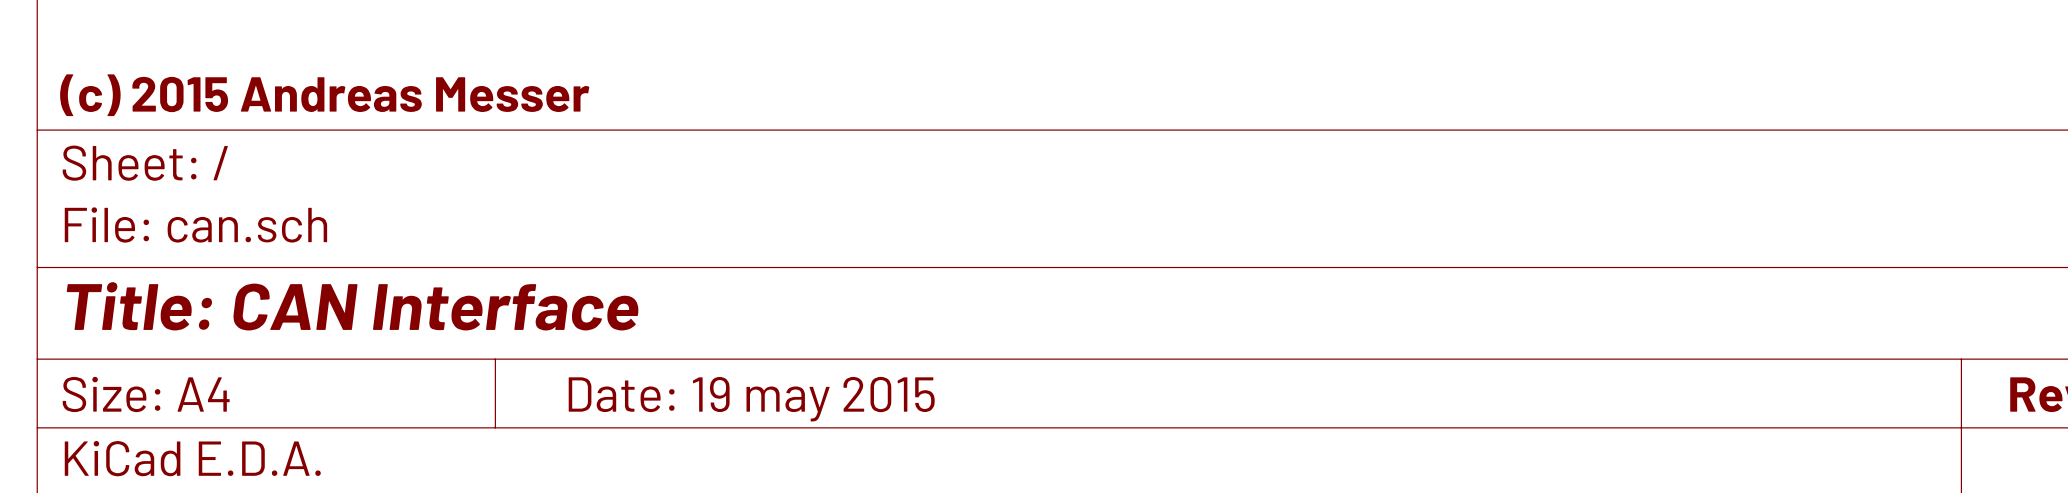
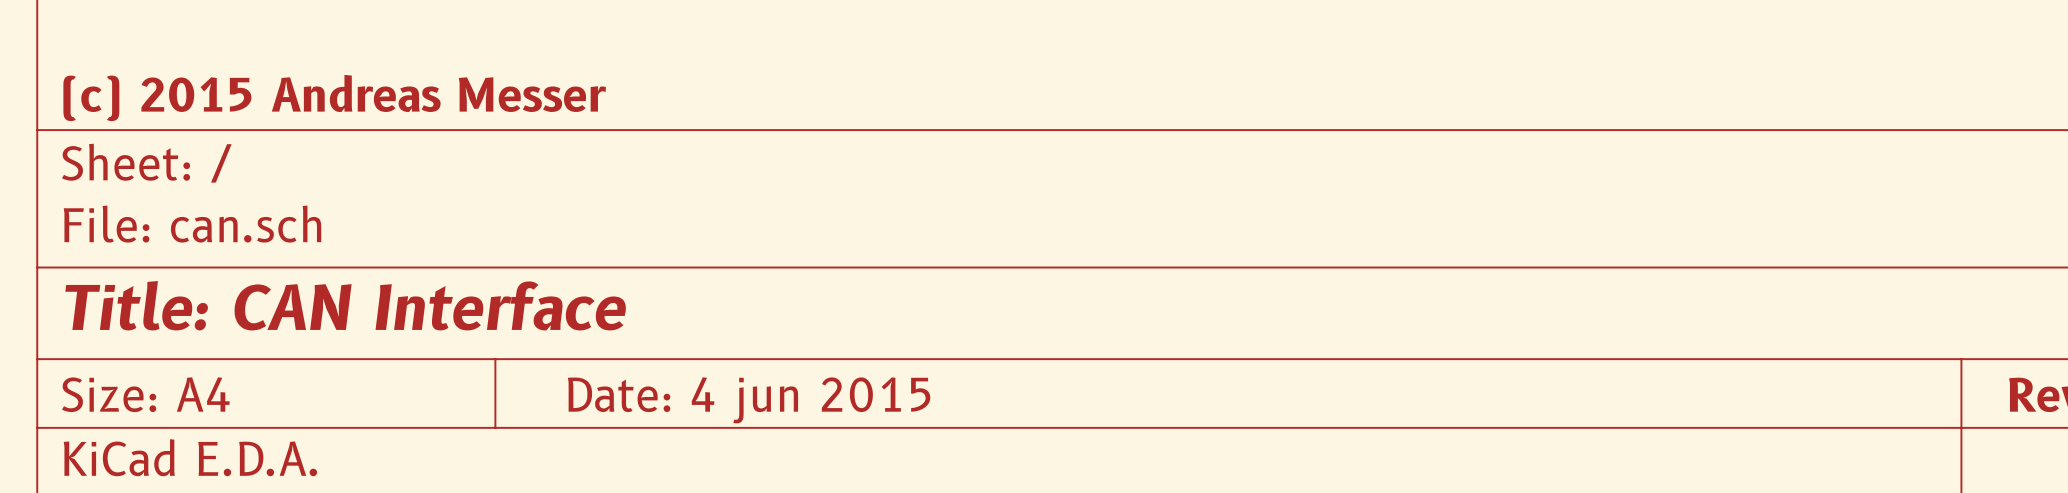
title block: Date: 19 may 2015 (751, 399) -> Date: 4 jun 2015 (749, 400)

